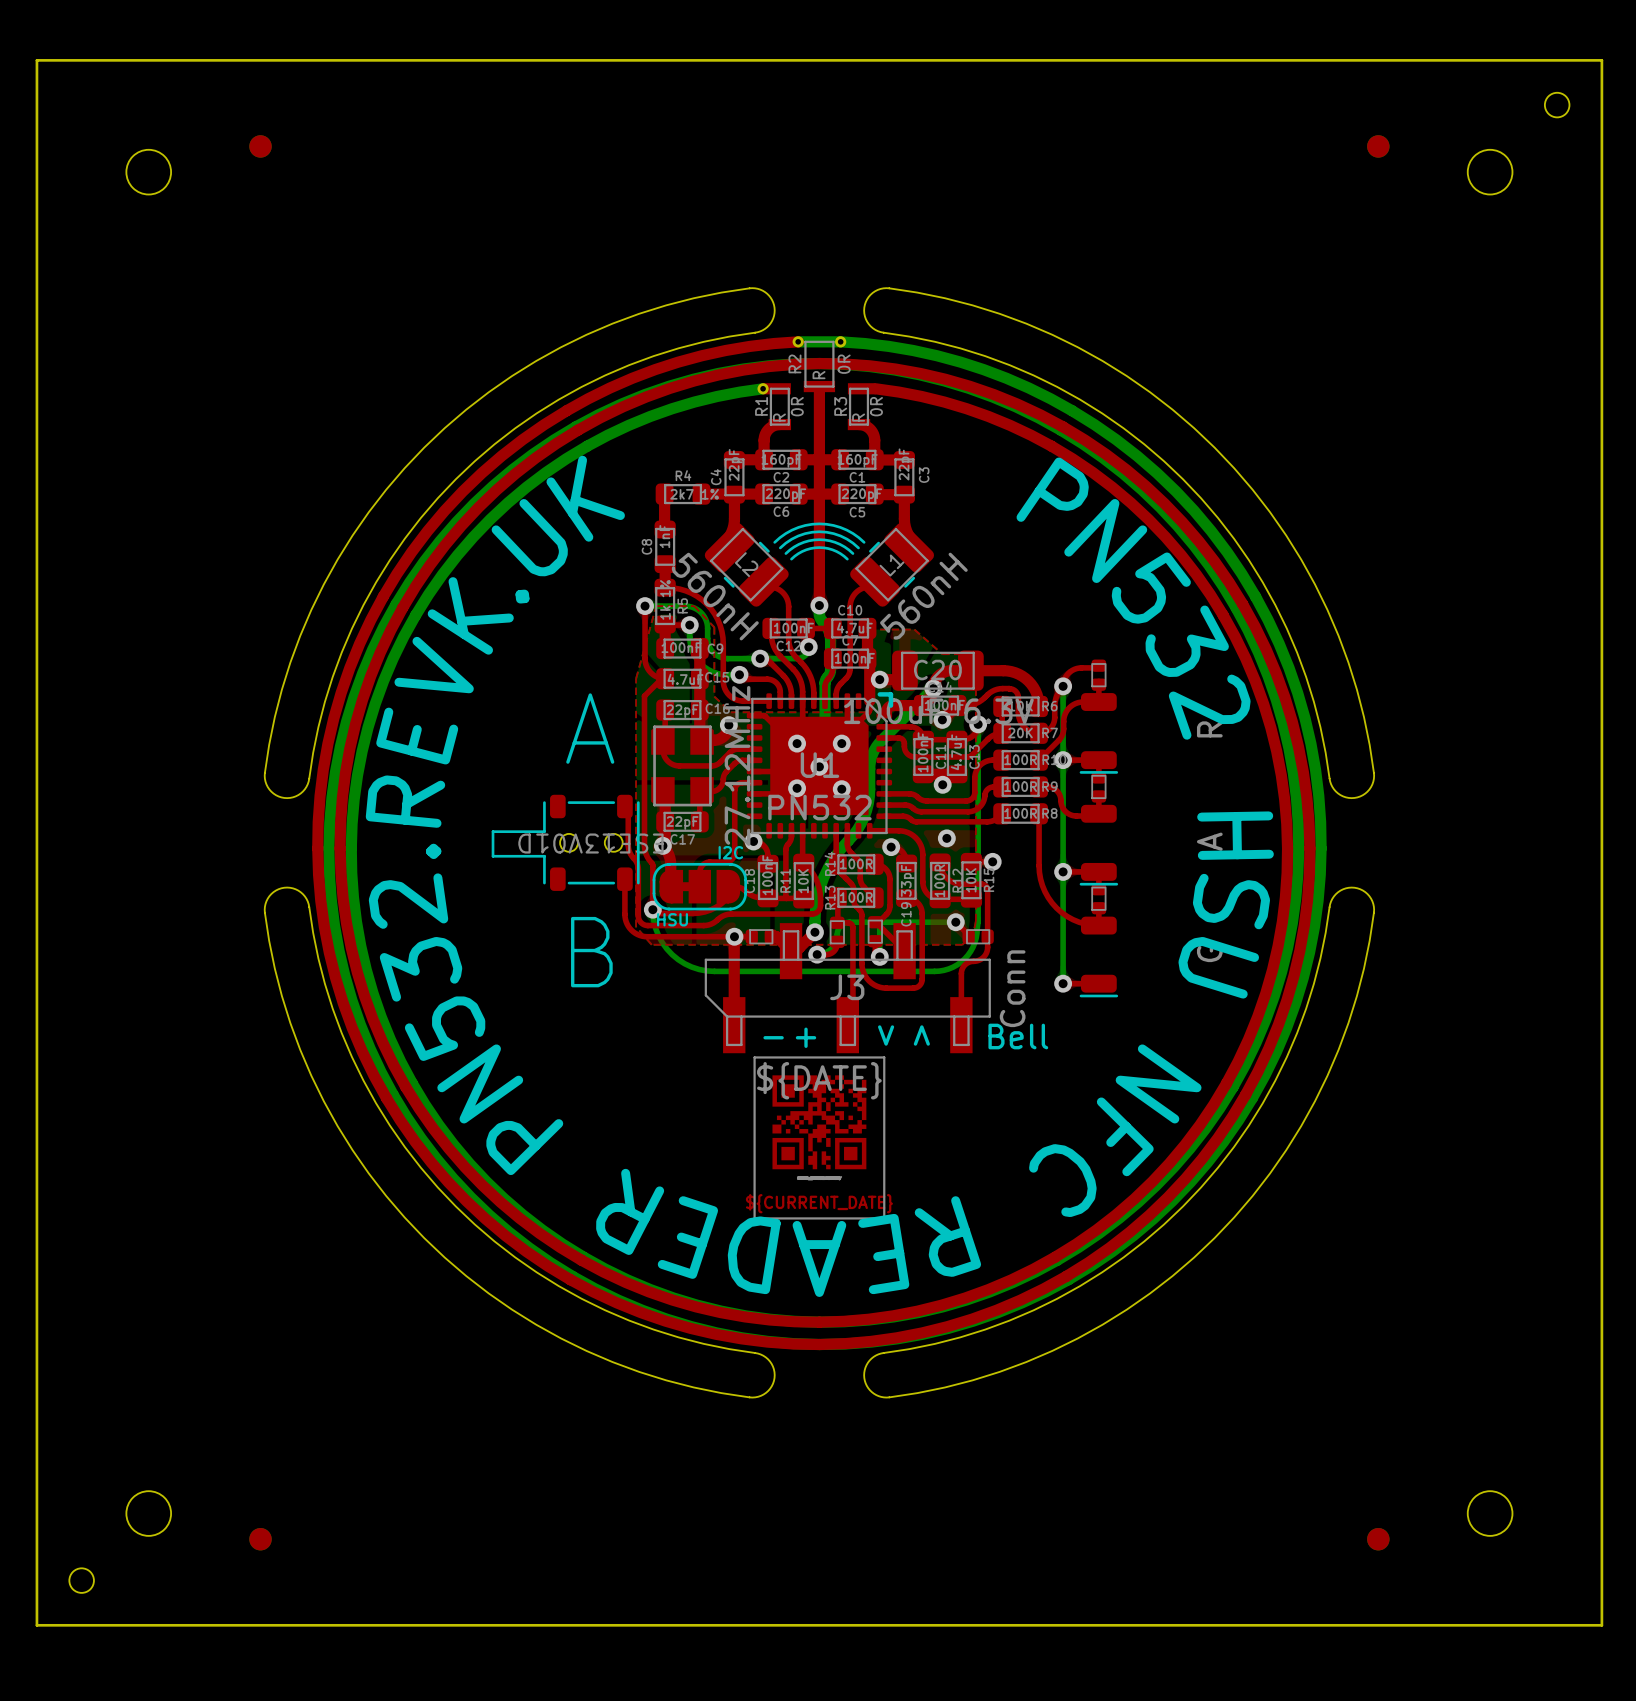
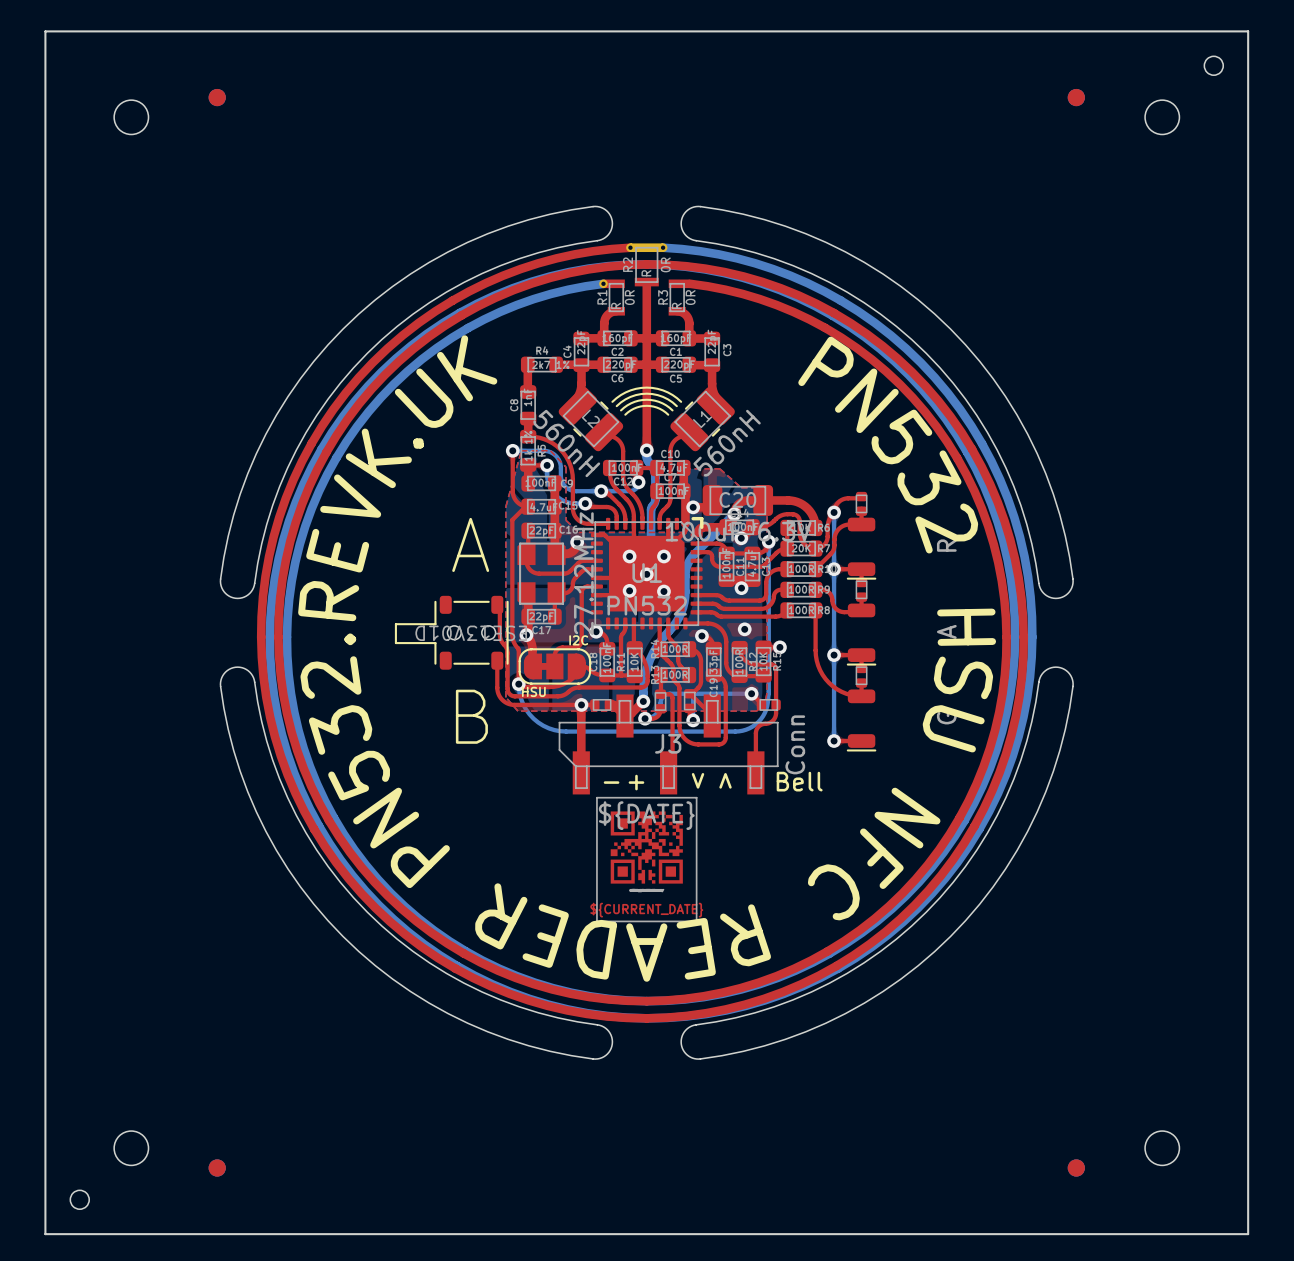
part footprint: [312, 336, 1327, 1351] -> [256, 243, 1037, 1023]

